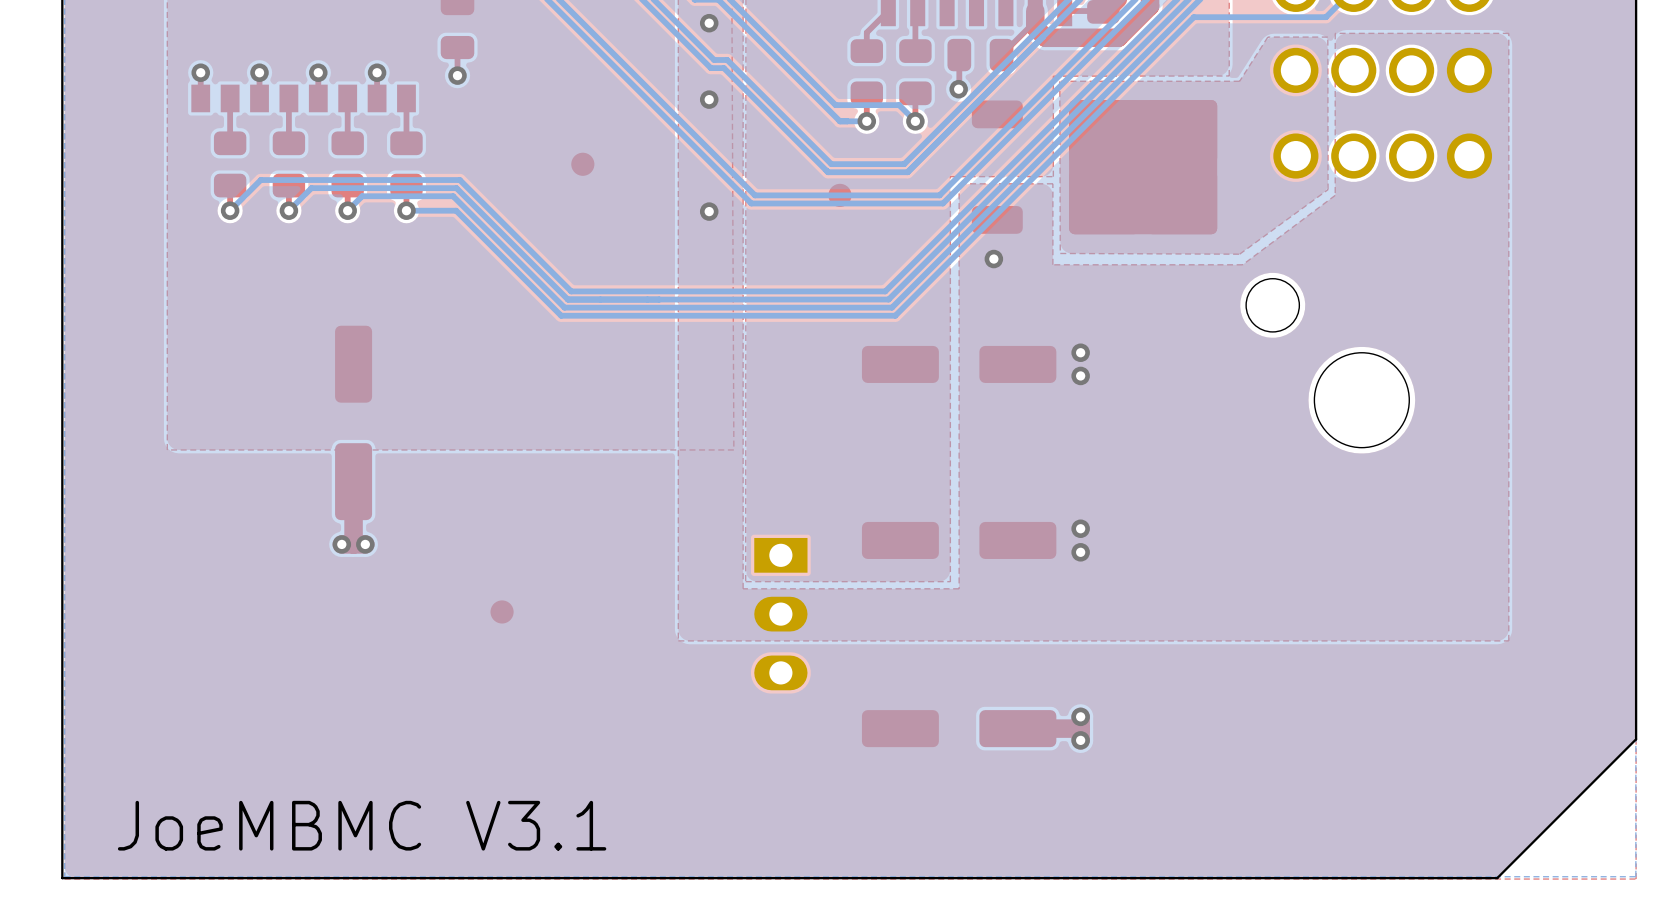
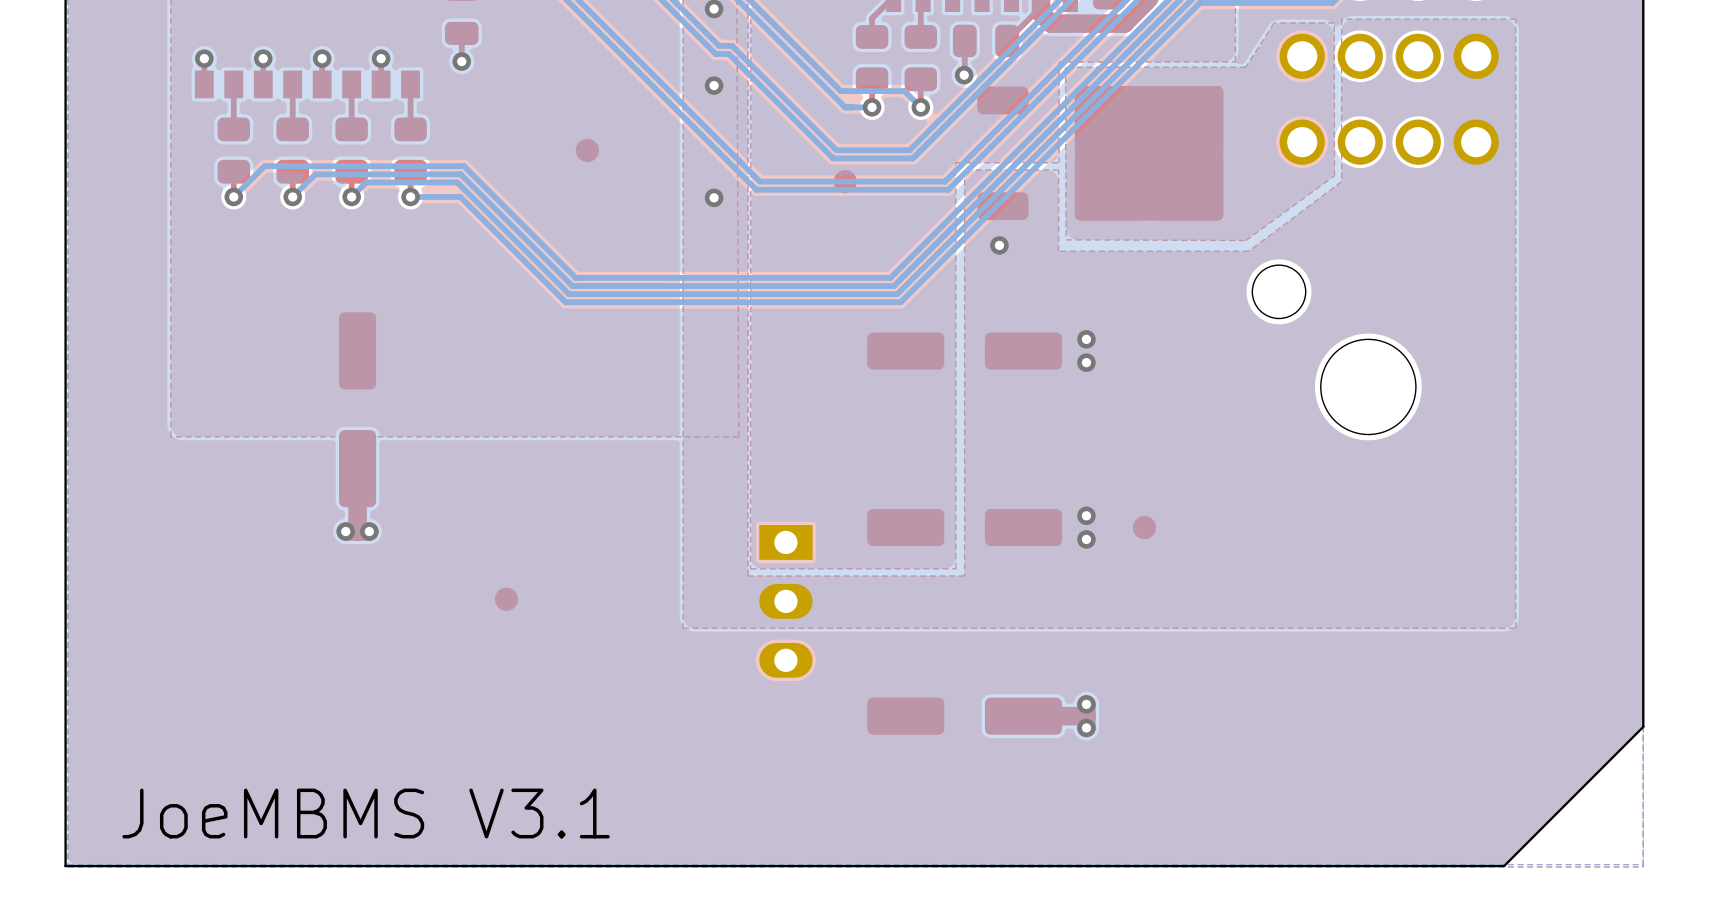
part: none -> (1144, 527)
text: JoeMBMC V3.1 (362, 825) -> JoeMBMS V3.1 (366, 813)

